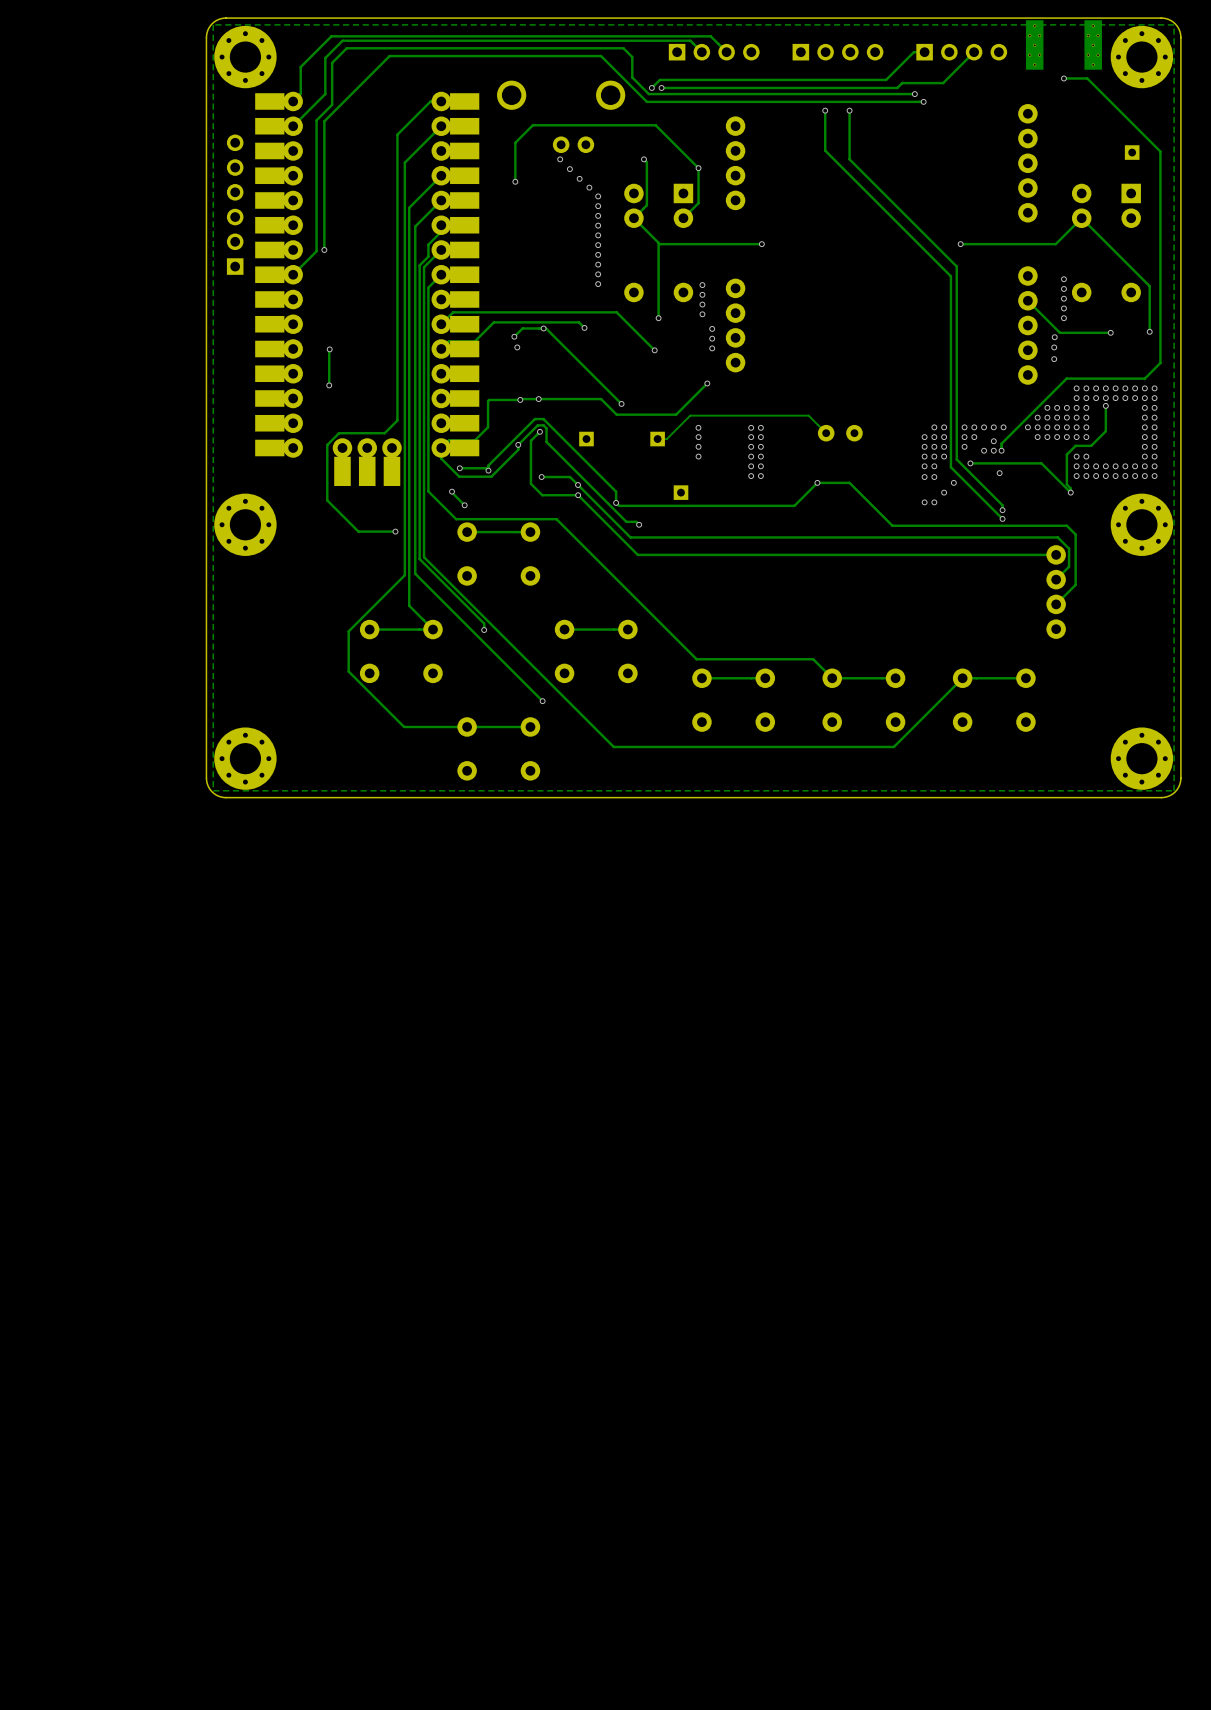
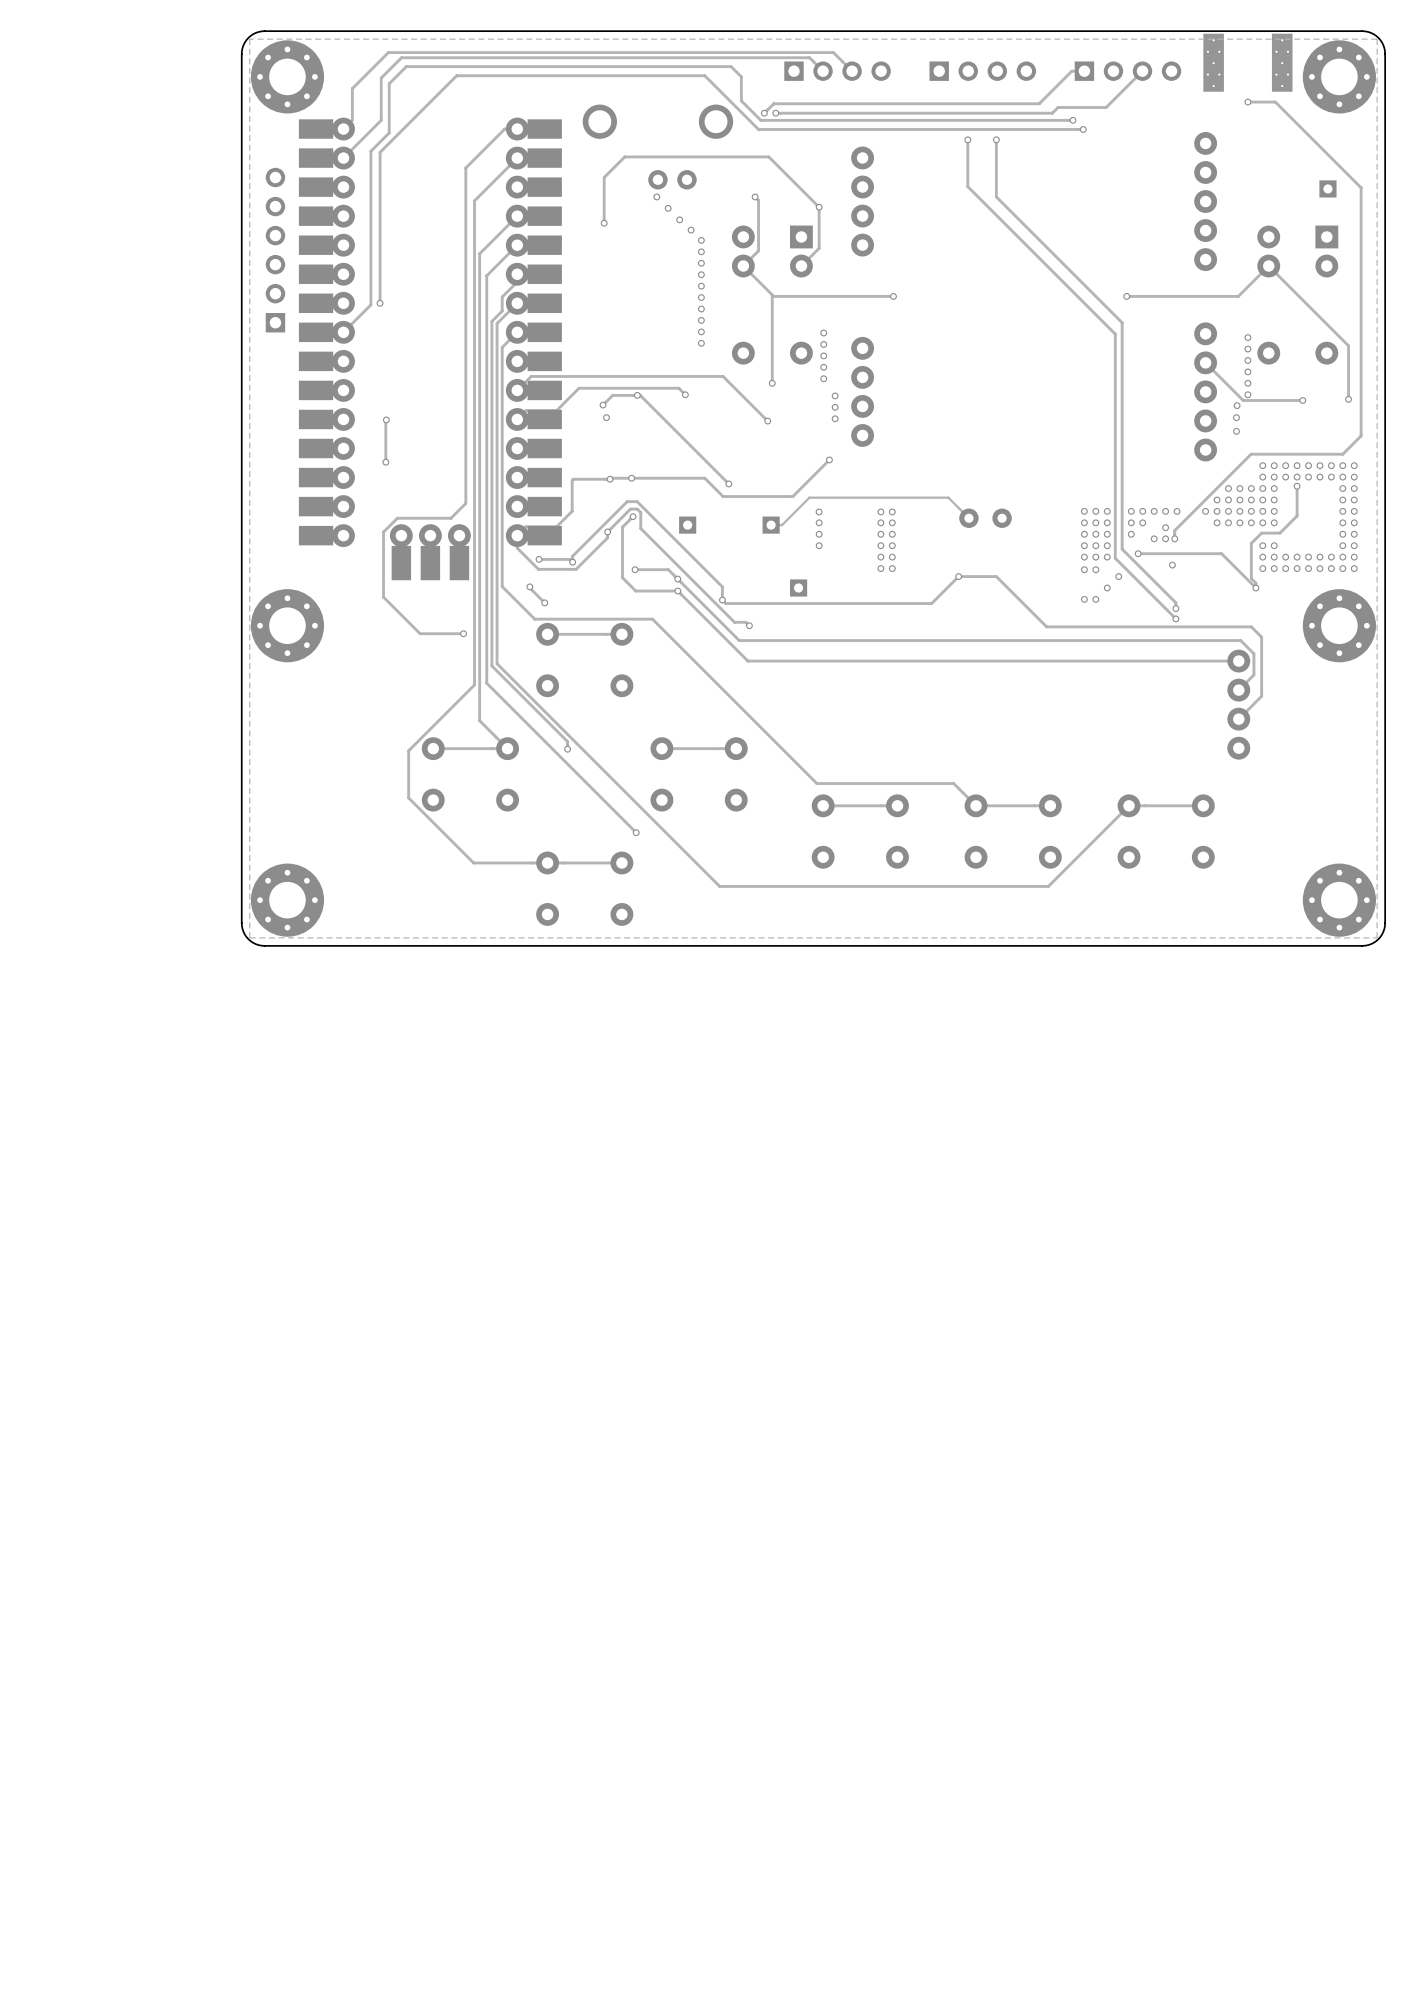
via: none -> (823, 333)
via: none -> (1247, 394)
via: none -> (1084, 511)
via: none -> (1107, 557)

